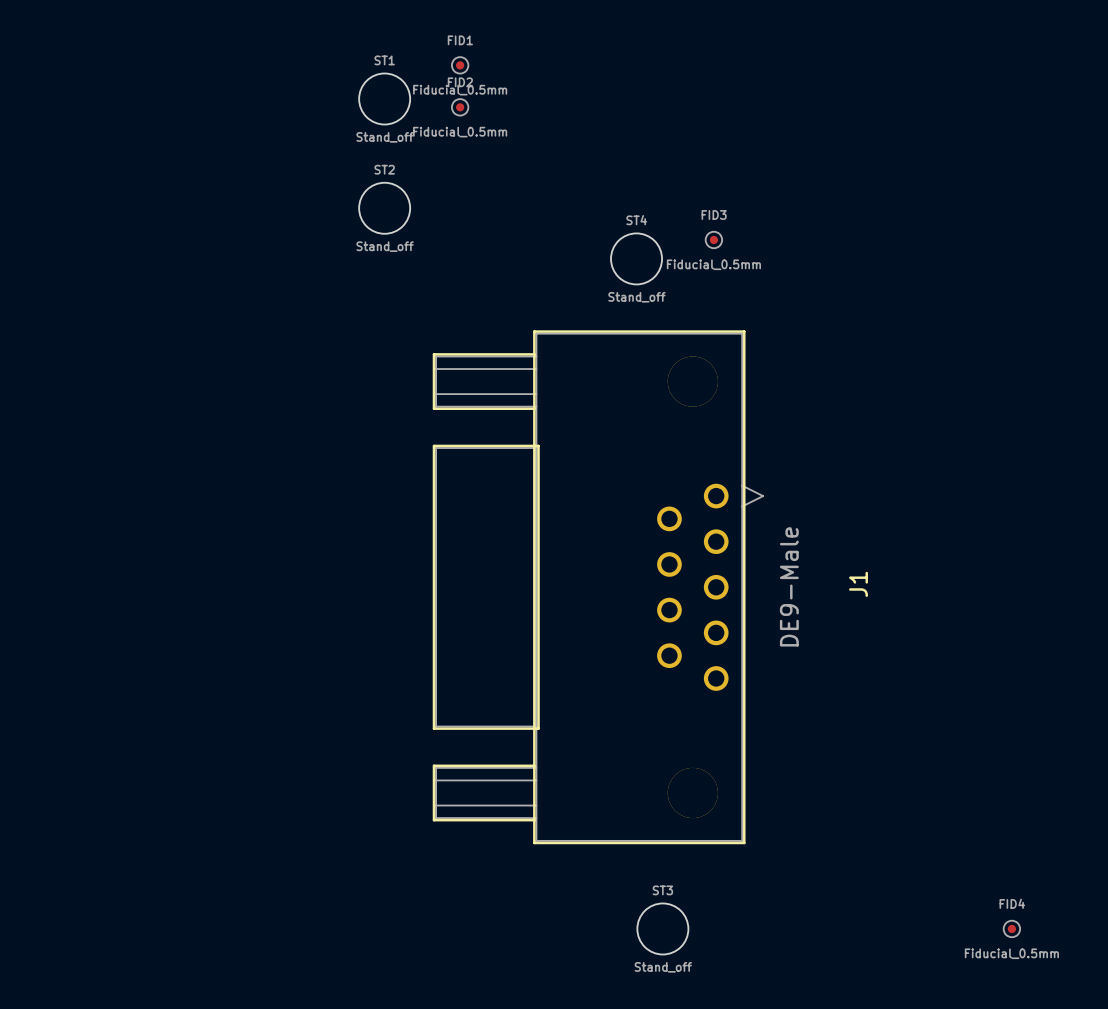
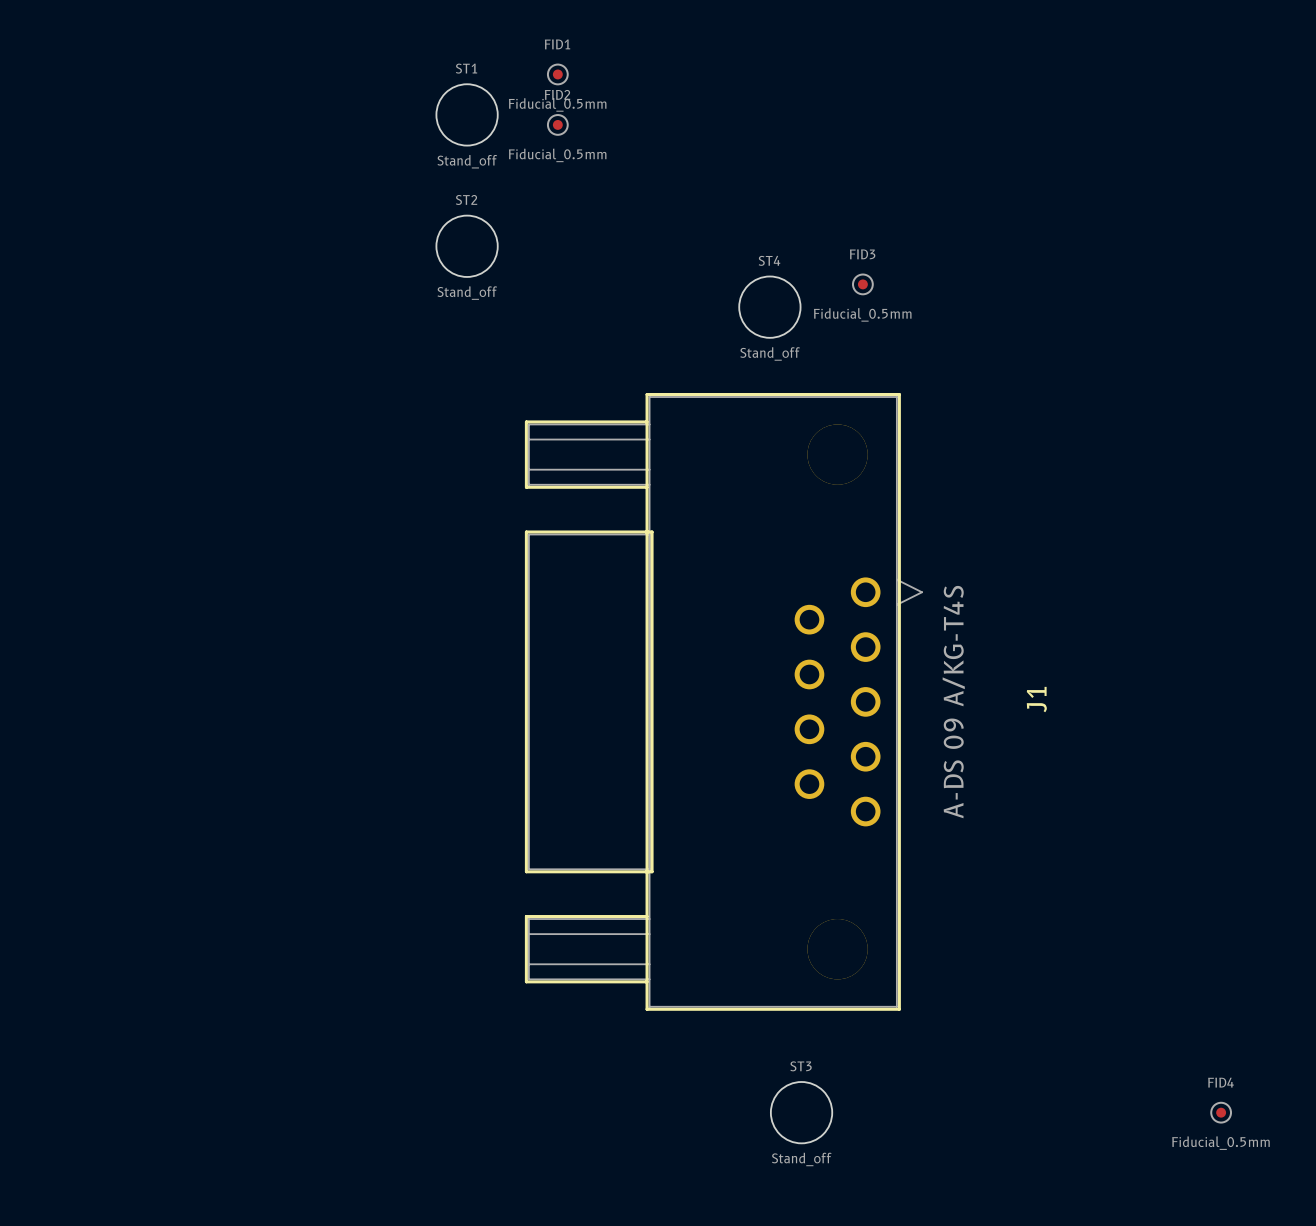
J1 value: DE9-Male (789, 586) -> A-DS 09 A/KG-T4S (953, 702)

